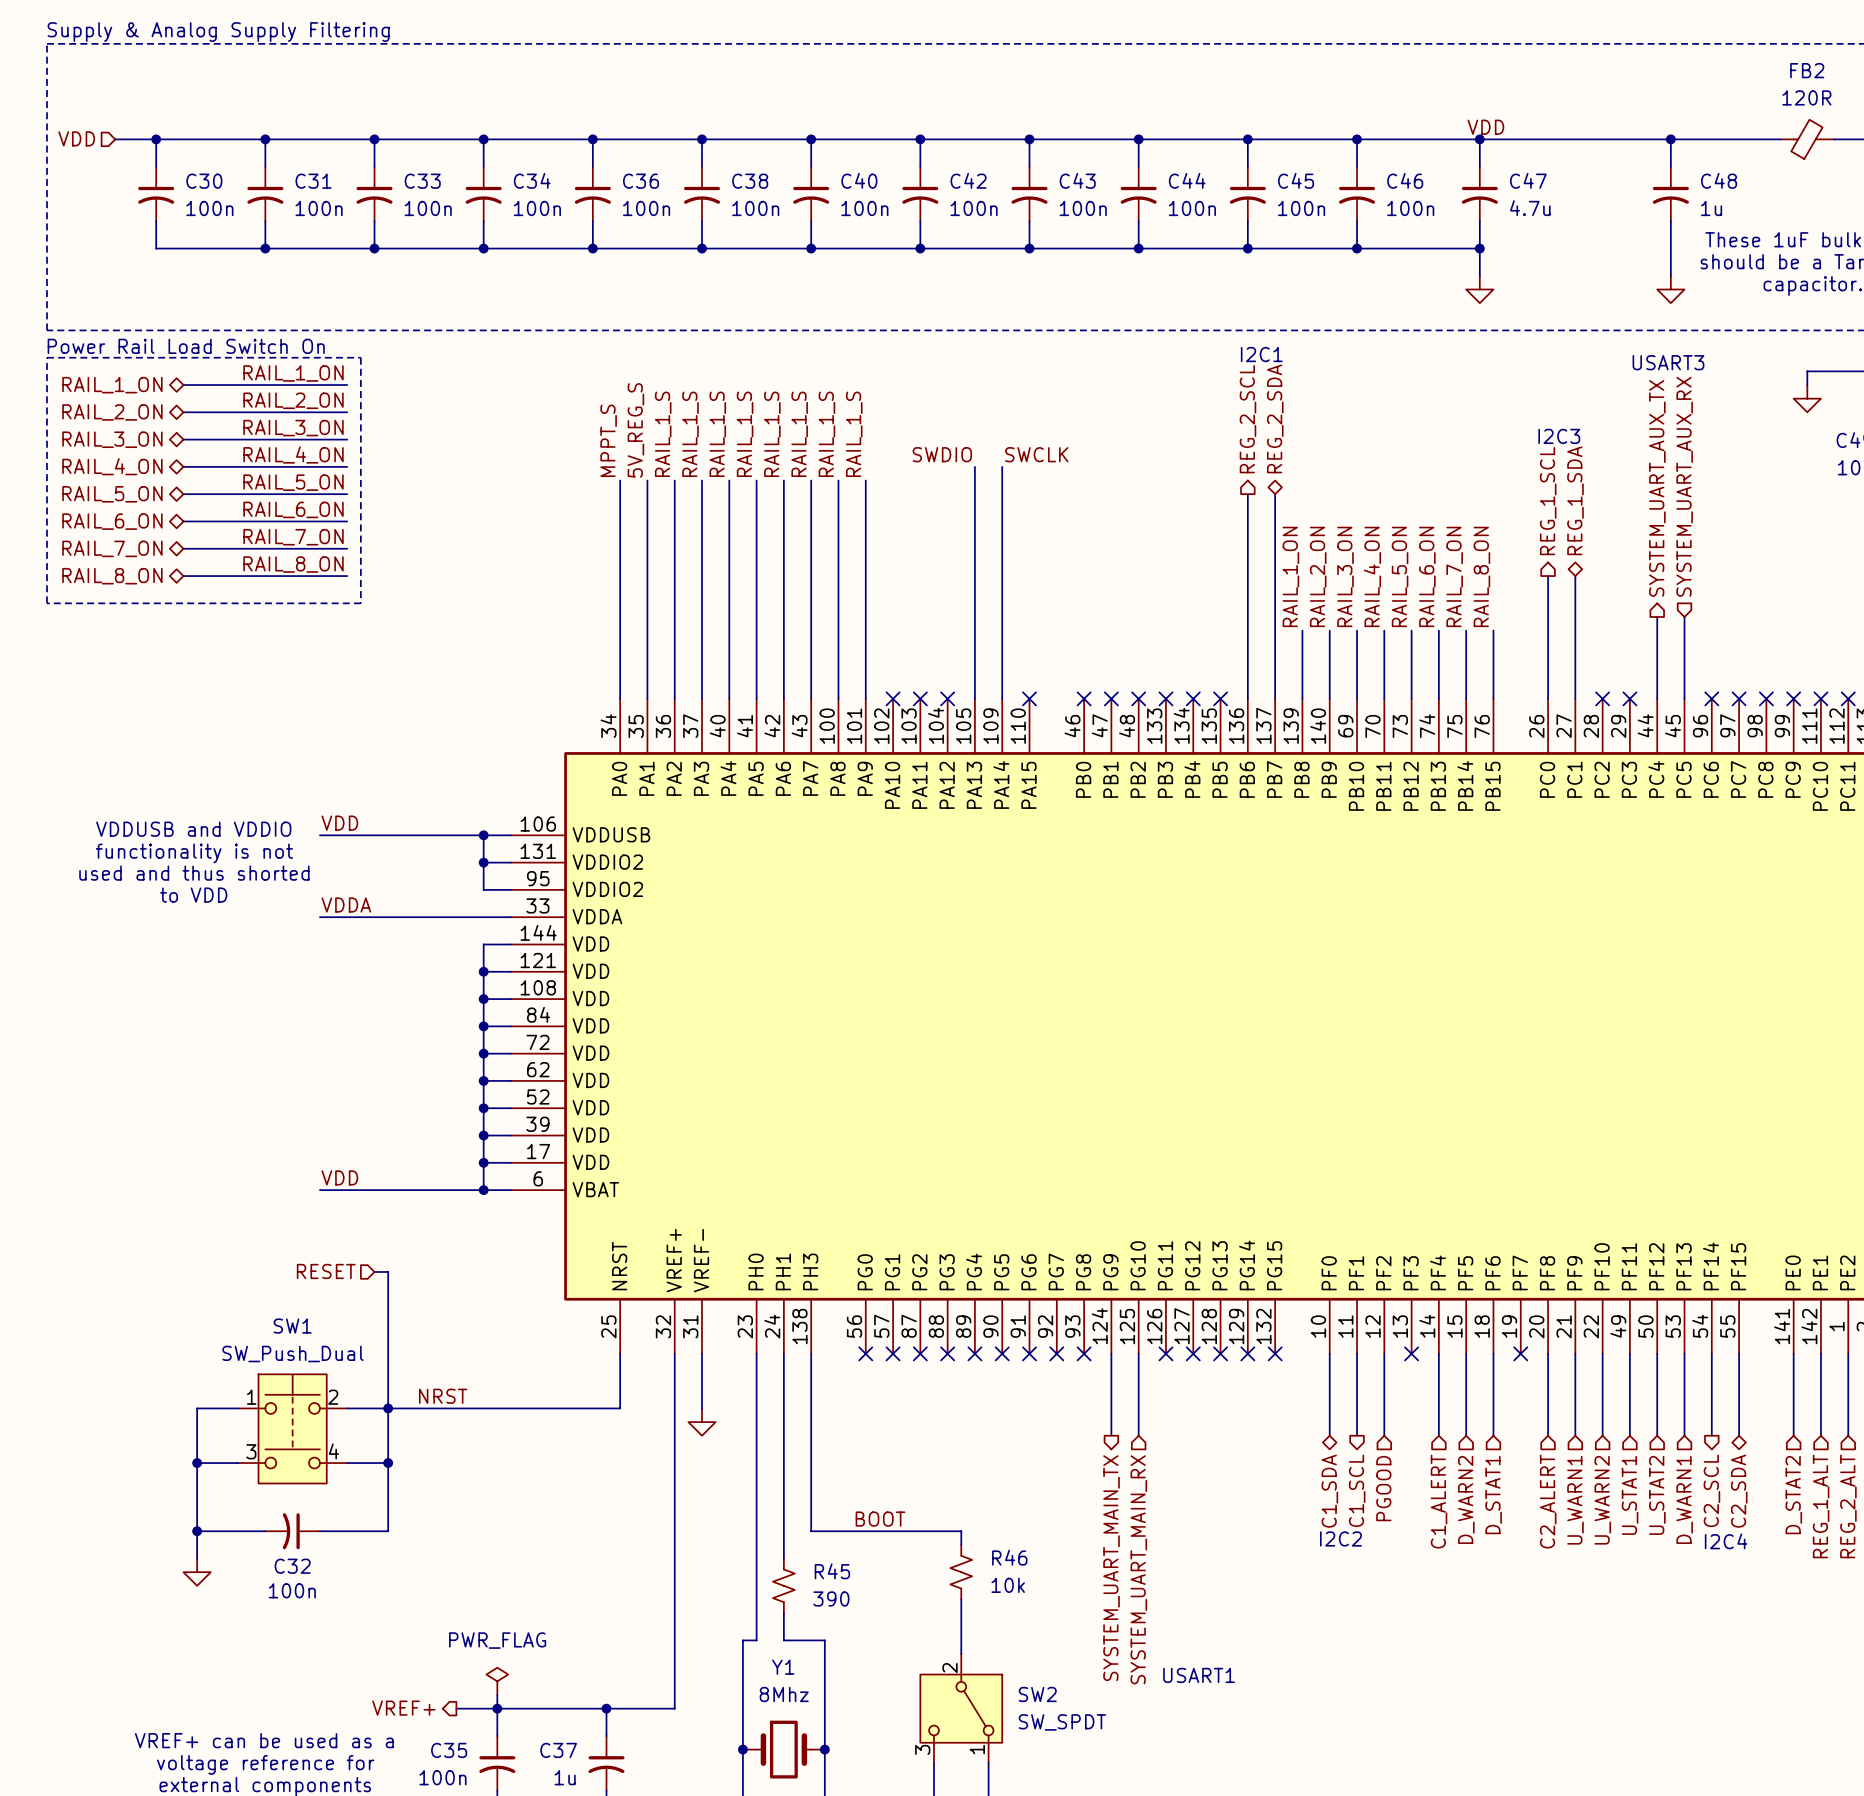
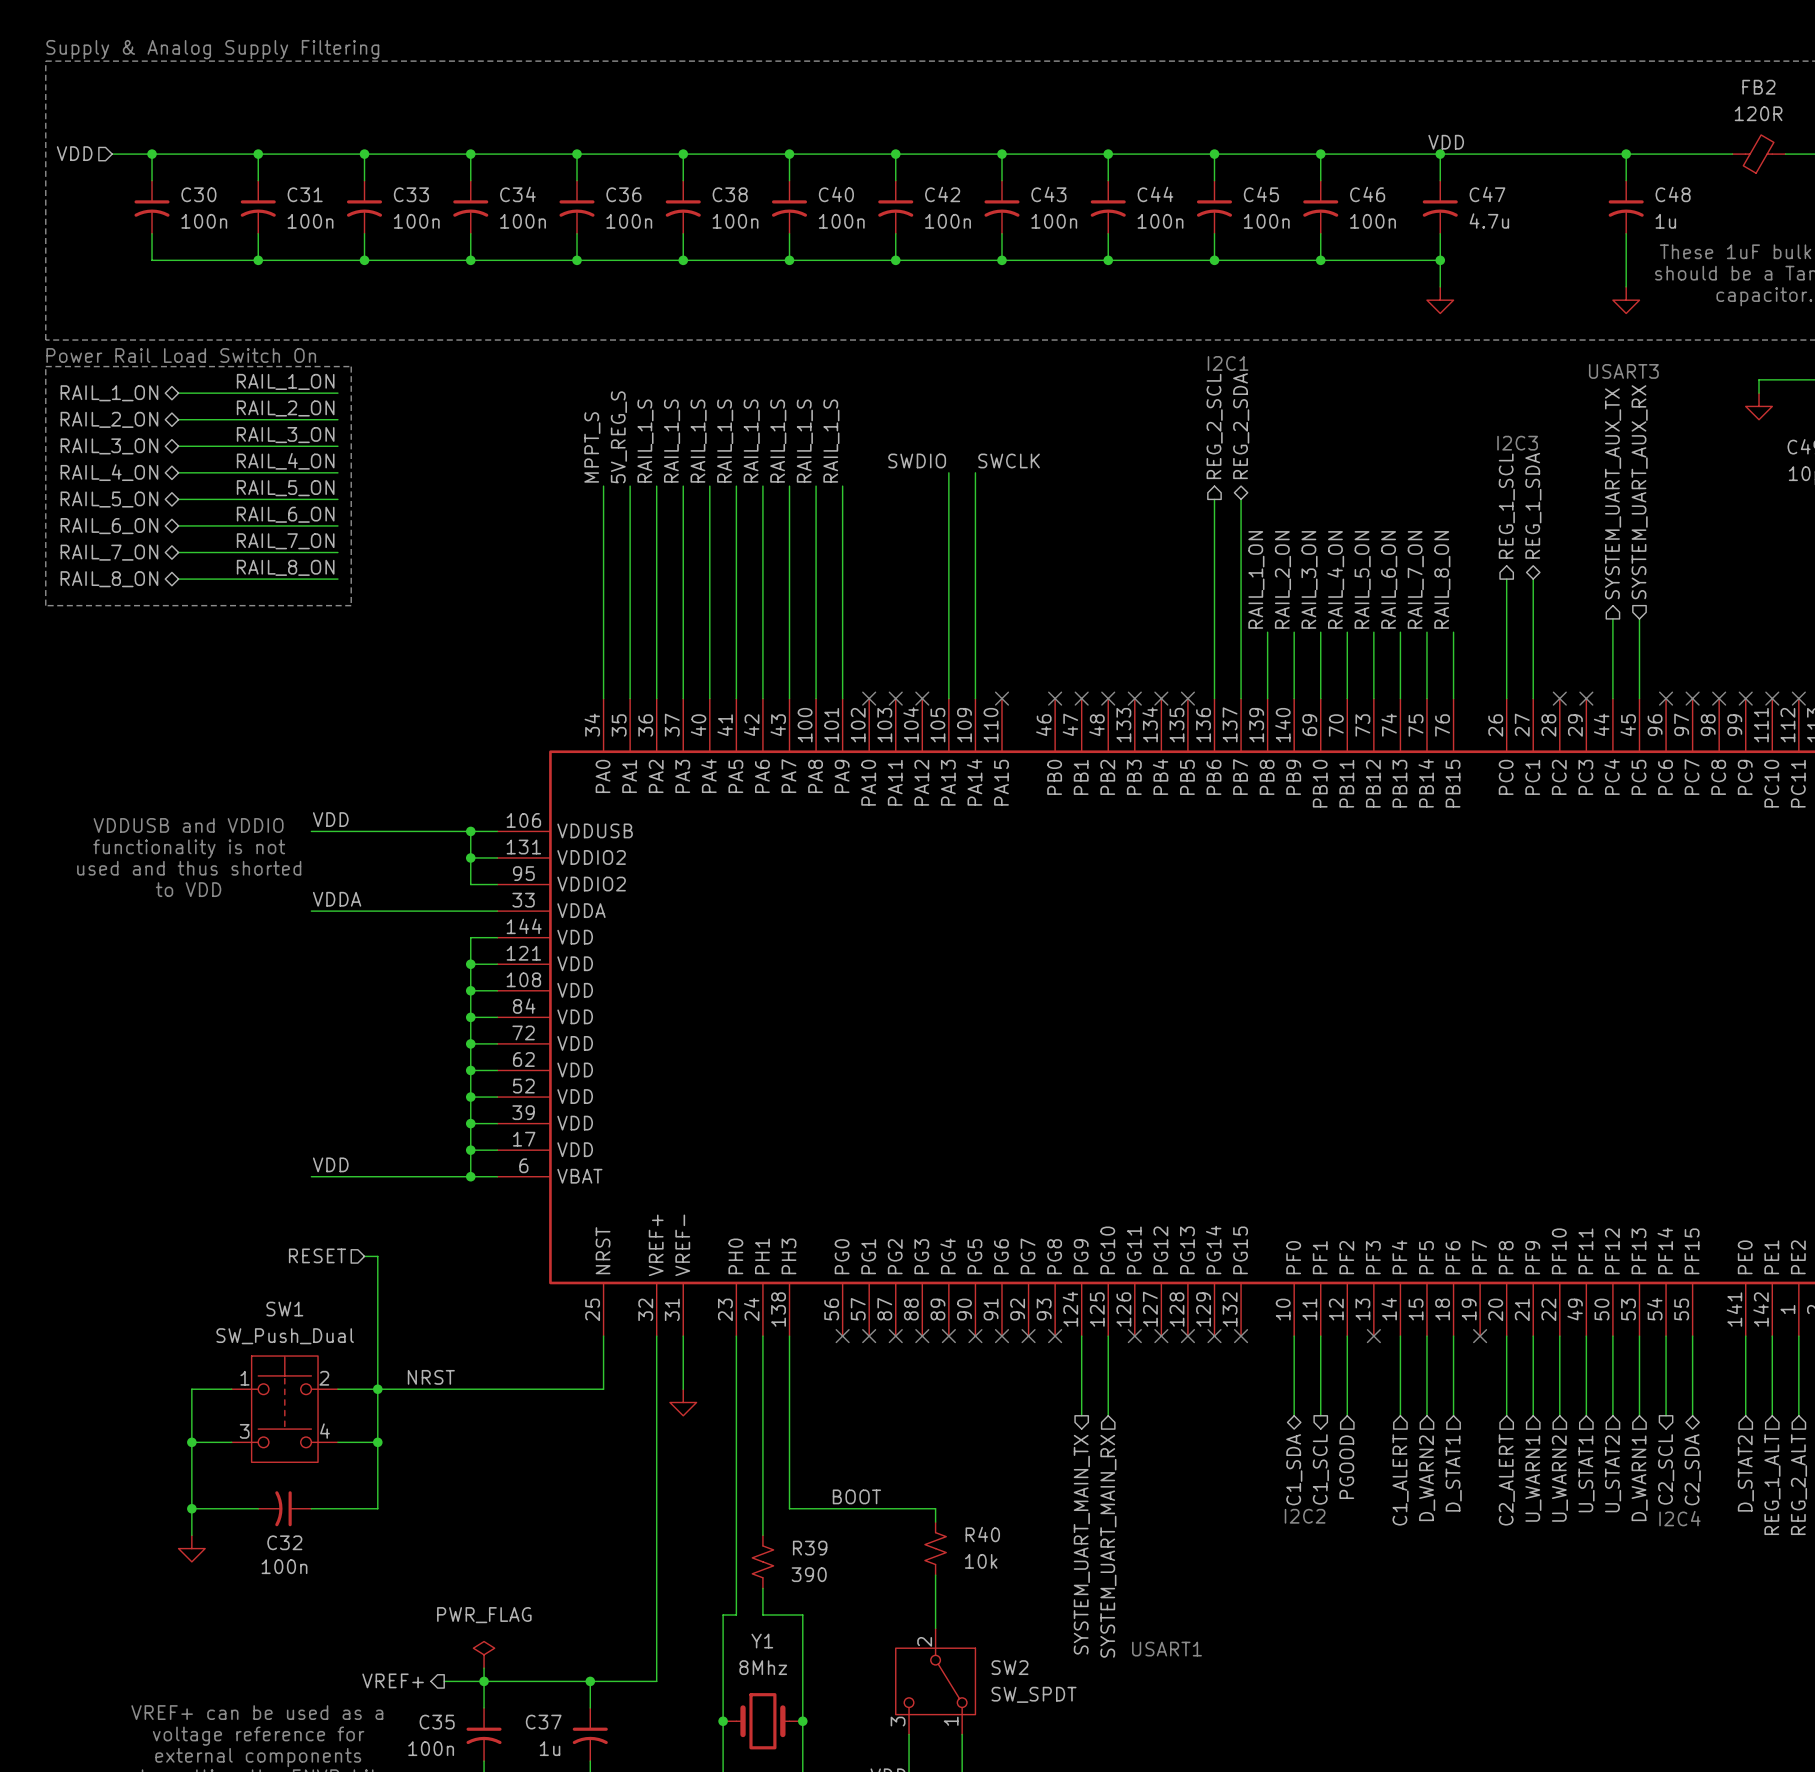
R46 name: R46 (1009, 1557) -> R40 (982, 1534)
R45 name: R45 (832, 1571) -> R39 (810, 1548)

